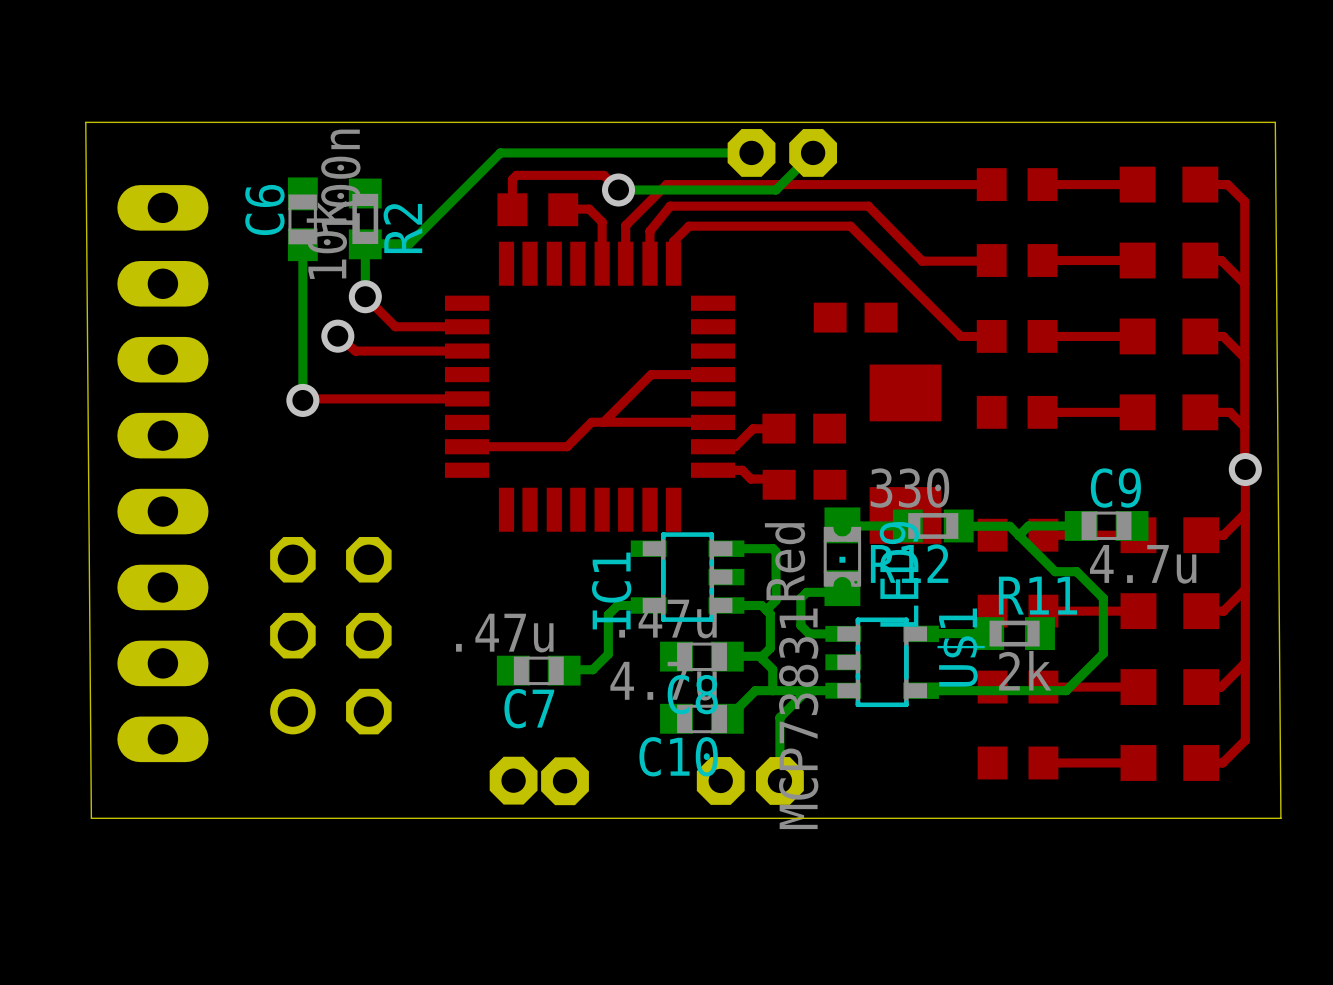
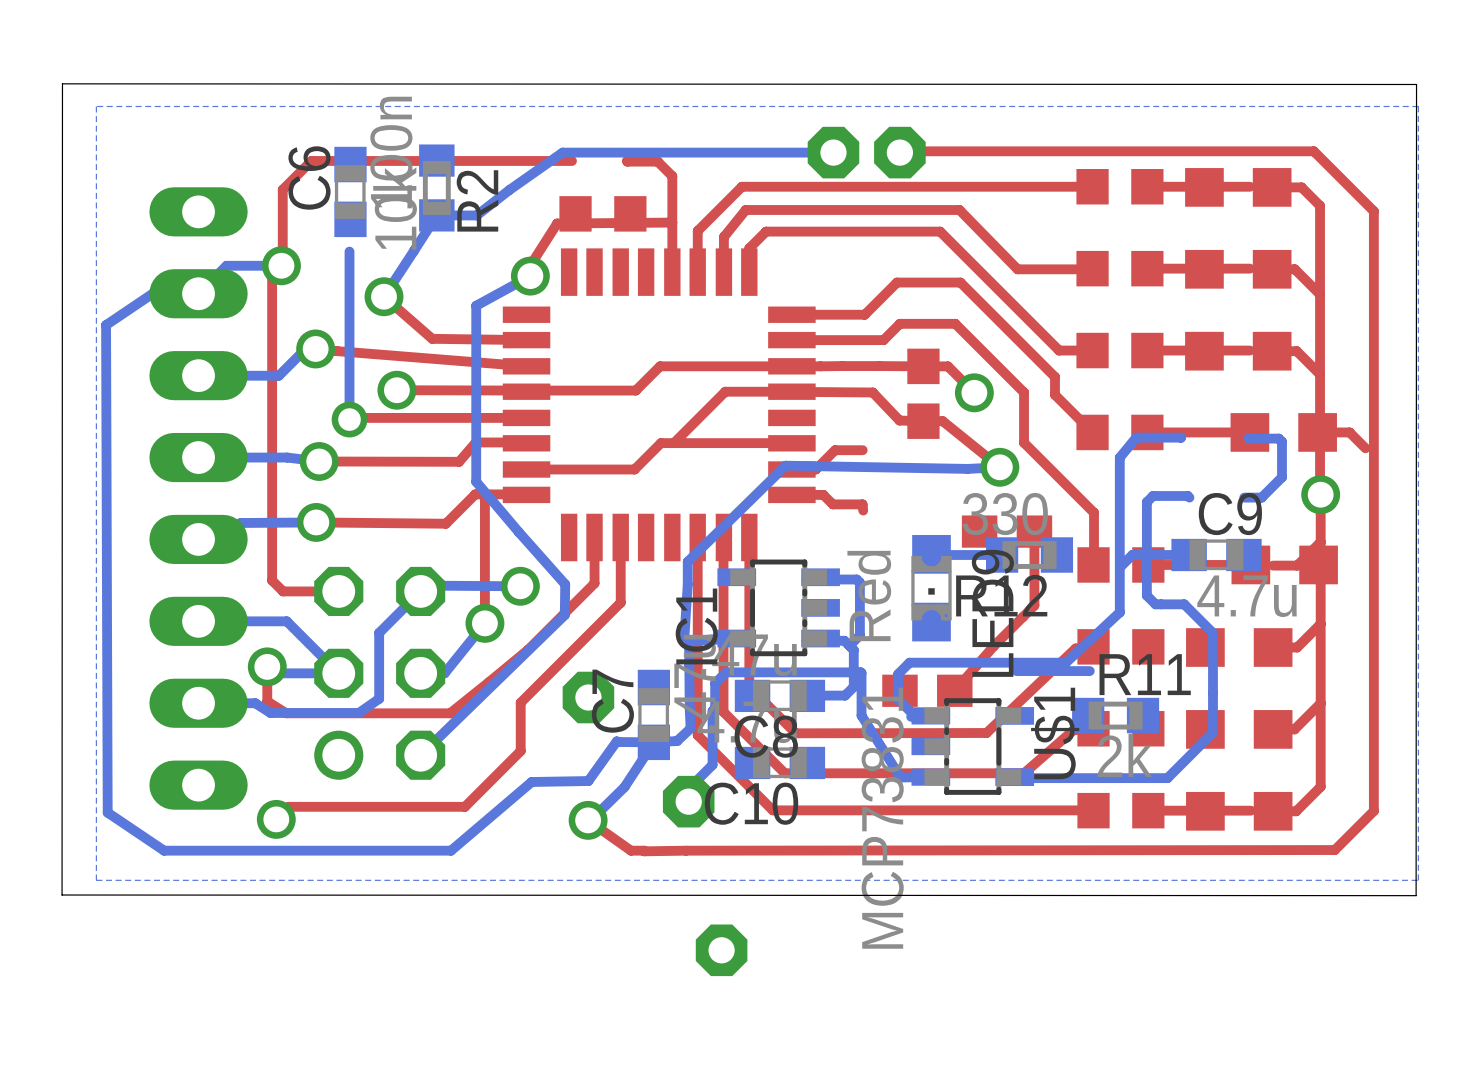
bottom zone outline: none -> (1418, 106) (96, 106) (96, 880) (1418, 880) (1418, 106)
board edge: (1275, 122) (85, 122) (91, 818) (1280, 818) (1275, 122) -> (62, 83) (1416, 84) (1416, 895) (62, 895) (62, 83)
bottom track: (500, 152) (409, 243) (365, 244) (365, 296) -> (562, 152) (476, 215) (436, 215) (384, 296)
top track: none -> (899, 152) (1313, 151) (1373, 211) (1373, 811) (1334, 850) (644, 851)
bottom track: (813, 152) (776, 190) (618, 190) -> none
top track: none -> (571, 160) (311, 160) (282, 189) (282, 264) (272, 275) (272, 580) (283, 591) (338, 591)
part position: (1168, 184) -> (1238, 187)
top track: (1200, 184) (1227, 184) (1244, 201) (1245, 469) (1245, 740) (1222, 762) (1201, 762) -> none
top track: none -> (1272, 187) (1301, 187) (1320, 205) (1320, 494)
top track: (618, 190) (603, 175) (516, 175) (512, 179) (512, 209) -> none
via: (618, 190) -> none
top track: (563, 209) (589, 209) (602, 222) -> (626, 160) (657, 161) (672, 176) (672, 227)
top track: none -> (672, 222) (557, 223) (530, 265) (530, 276)
R2 position: (365, 218) -> (436, 187)
C6 position: (302, 219) -> (350, 191)
bottom track: none -> (281, 265) (226, 265) (198, 293) (152, 293) (106, 325) (107, 812) (164, 850) (451, 850) (531, 781) (588, 781) (616, 741) (653, 742)
via: none -> (281, 265)
part position: (1168, 260) -> (1238, 269)
top track: (1200, 260) (1221, 260) (1244, 283) -> (1272, 269) (1294, 269) (1320, 294)
bottom track: none -> (530, 276) (476, 305) (476, 481) (565, 584) (564, 615) (420, 755)
via: none -> (530, 276)
via: none -> (384, 296)
top track: (365, 296) (395, 326) (466, 326) -> (384, 296) (432, 338) (526, 340)
via: (365, 296) -> none
top track: none -> (791, 314) (864, 314) (897, 282) (960, 282) (1054, 377) (1054, 394) (1092, 432)
part: (855, 317) -> none
top track: none -> (791, 340) (883, 340) (899, 323) (955, 323) (1024, 392) (1024, 442) (1094, 512) (1093, 564)
bottom track: none -> (315, 348) (305, 348) (278, 375) (198, 375)
via: none -> (315, 348)
top track: (337, 336) (355, 351) (466, 351) -> (315, 348) (526, 366)
via: (337, 336) -> none
part position: (1168, 336) -> (1238, 351)
top track: (1200, 336) (1223, 336) (1244, 357) -> (1272, 351) (1296, 351) (1320, 374)
top track: none -> (396, 390) (527, 390)
via: none -> (396, 390)
top track: none -> (527, 390) (635, 390) (660, 366) (947, 366) (974, 392)
top track: none -> (792, 391) (872, 392) (899, 420) (942, 421) (999, 467)
via: none -> (974, 392)
part: none -> (923, 393)
bottom track: none -> (1180, 437) (1136, 437) (1119, 457) (1119, 612) (1065, 662) (909, 662) (898, 673) (898, 699) (914, 715) (930, 715) (911, 716)
bottom track: none -> (1248, 437) (1278, 438) (1281, 441) (1281, 477) (1261, 497) (1244, 497)
top track: none -> (526, 443) (475, 442) (459, 461) (319, 461)
part: (804, 428) -> none
bottom track: none -> (198, 457) (287, 457) (319, 461)
via: none -> (319, 461)
via: none -> (999, 467)
bottom track: none -> (996, 469) (999, 467) (967, 468) (785, 465) (687, 561) (684, 640) (736, 638) (689, 640) (690, 728) (677, 741) (653, 742)
part: (905, 454) -> none
top track: none -> (482, 494) (484, 496) (484, 623)
via: (1245, 469) -> none
top track: none -> (526, 494) (475, 494) (445, 523) (316, 522)
top track: none -> (1320, 494) (1320, 786) (1296, 811) (1273, 811)
via: none -> (1320, 494)
part: (804, 484) -> none
bottom track: none -> (316, 522) (240, 523) (198, 539)
via: none -> (316, 522)
part: none -> (1007, 531)
top track: none -> (1034, 531) (1034, 605) (993, 646) (954, 690)
top track: none -> (594, 537) (594, 583) (528, 649) (450, 713) (286, 713) (267, 701) (267, 666)
top track: none -> (620, 537) (620, 602) (520, 702) (520, 751) (464, 806) (288, 806) (276, 819)
top track: none -> (697, 537) (697, 735) (772, 810) (1093, 810)
top track: none -> (749, 537) (749, 686) (795, 733) (986, 732) (1075, 648) (1091, 647)
top track: none -> (723, 537) (723, 712) (784, 773) (1024, 773) (1073, 730) (1090, 729)
top track: (1245, 513) (1223, 535) (1201, 535) -> (1320, 542) (1297, 565) (1273, 565)
bottom track: (958, 526) (1009, 526) (1055, 571) -> (1189, 497) (1187, 495) (1153, 495) (1146, 502) (1146, 595) (1155, 604) (1161, 604)
bottom track: none -> (520, 586) (426, 585) (379, 632) (379, 698) (358, 712) (270, 712) (255, 703) (198, 703)
via: none -> (520, 586)
IC1 position: (687, 577) -> (778, 607)
bottom track: none -> (198, 621) (286, 621) (338, 673) (273, 673) (267, 666)
bottom track: (842, 588) (838, 592) (806, 592) (800, 598) (800, 625) (809, 633) (843, 633) -> none
bottom track: none -> (484, 623) (444, 673) (420, 673)
via: none -> (484, 623)
top track: (1245, 589) (1223, 611) (1201, 611) -> (1320, 624) (1297, 647) (1273, 647)
bottom track: (648, 605) (617, 605) (608, 614) (608, 654) (592, 669) (564, 670) -> none
top track: (1138, 611) (1043, 611) -> none
part position: (1169, 611) -> (1239, 647)
via: none -> (267, 666)
R11 position: (1014, 633) -> (1115, 715)
part: none -> (927, 690)
bottom track: (1103, 653) (1066, 690) (921, 690) -> (1212, 692) (1212, 732) (1167, 778) (1014, 777)
bottom track: (762, 656) (762, 658) (772, 669) (772, 690) -> none
part: none -> (588, 697)
U$1 position: (882, 662) -> (972, 746)
top track: (1245, 662) (1221, 687) (1201, 687) -> (1320, 703) (1294, 729) (1273, 729)
C7 rotation: 0° (538, 670) -> 90° clockwise (653, 714)
top track: (1138, 687) (1043, 687) -> none
part position: (1169, 687) -> (1239, 729)
bottom track: (806, 690) (779, 717) (779, 780) -> none
bottom track: (843, 690) (755, 690) (727, 718) -> none
bottom track: none -> (653, 742) (624, 787) (591, 819) (588, 820)
bottom track: none -> (930, 777) (900, 777) (861, 715) (860, 672) (726, 672) (715, 683) (715, 708) (712, 711) (712, 764) (688, 788) (688, 801)
part: none -> (688, 801)
part position: (1169, 762) -> (1239, 811)
via: none -> (276, 819)
top track: none -> (588, 820) (630, 850) (644, 850)
via: none -> (588, 820)
part: (513, 780) -> none
part: (720, 780) -> none
part: (779, 780) -> none
part: (565, 781) -> none
part: none -> (721, 950)

